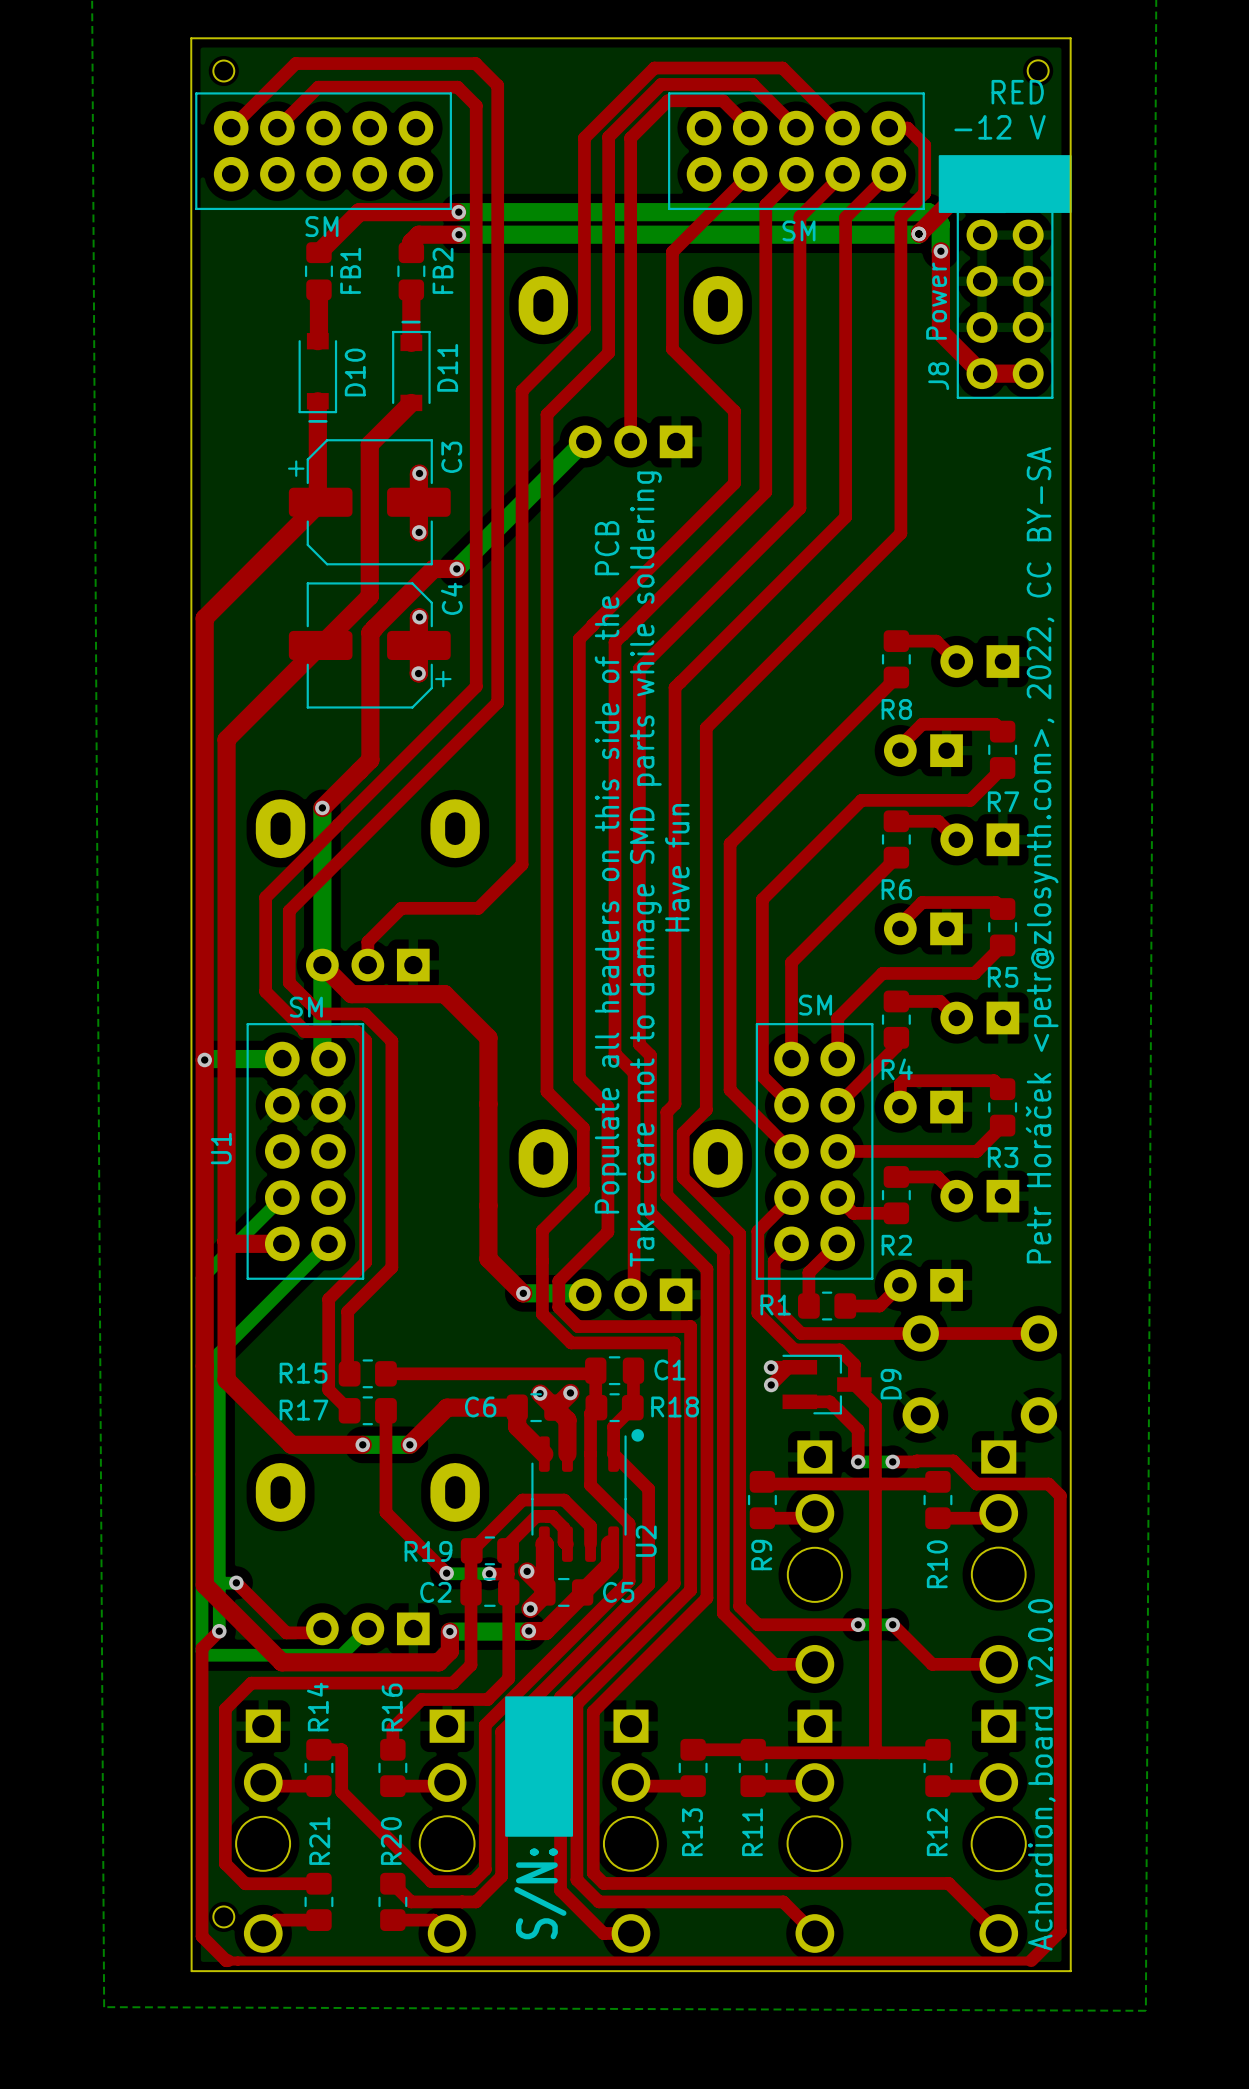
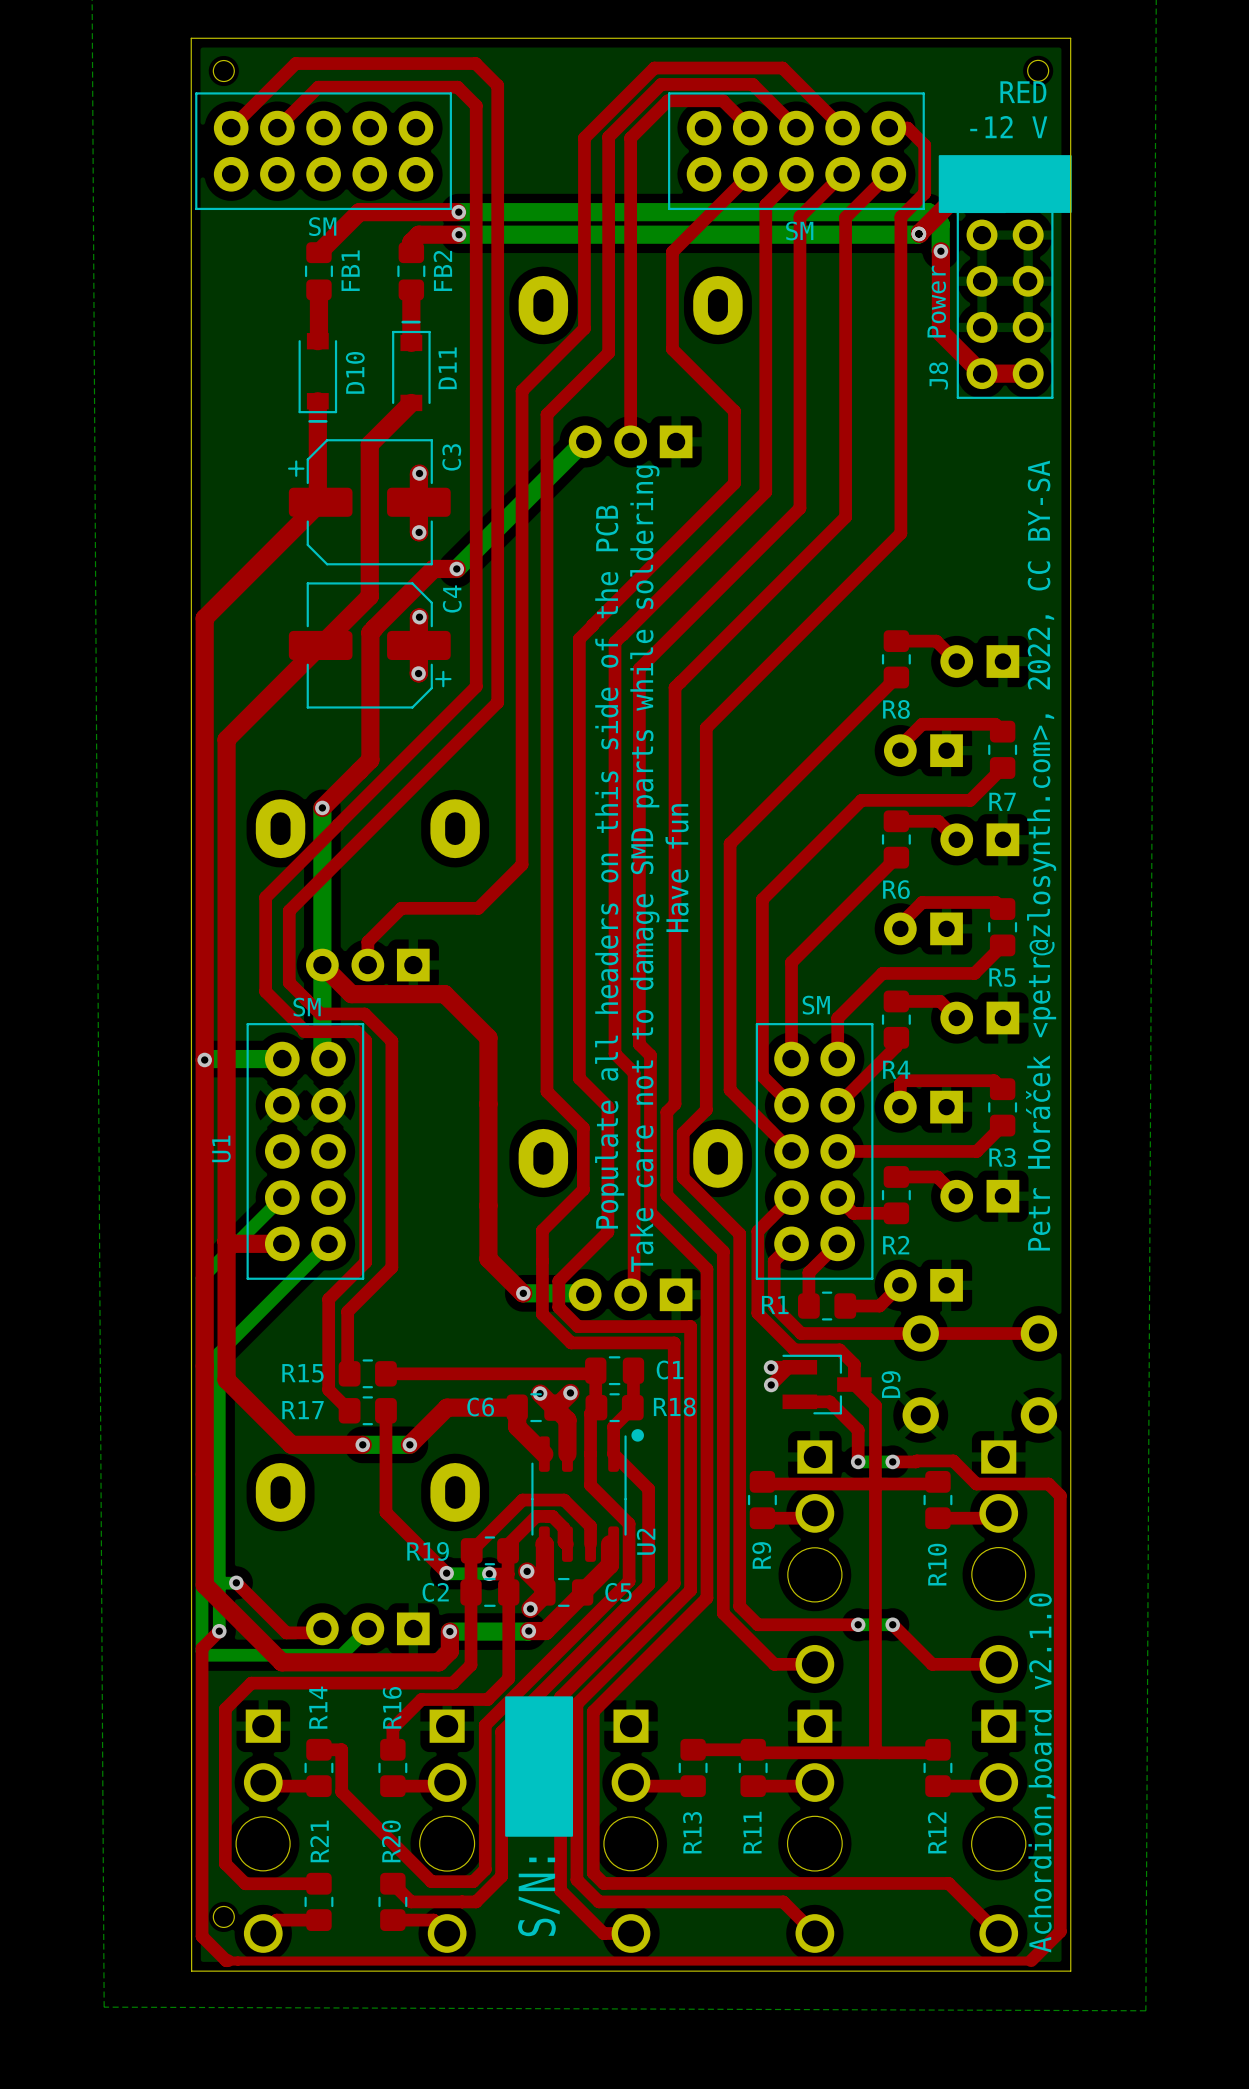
text: board v2.0.0 (1040, 1691) -> board v2.1.0 (1040, 1690)

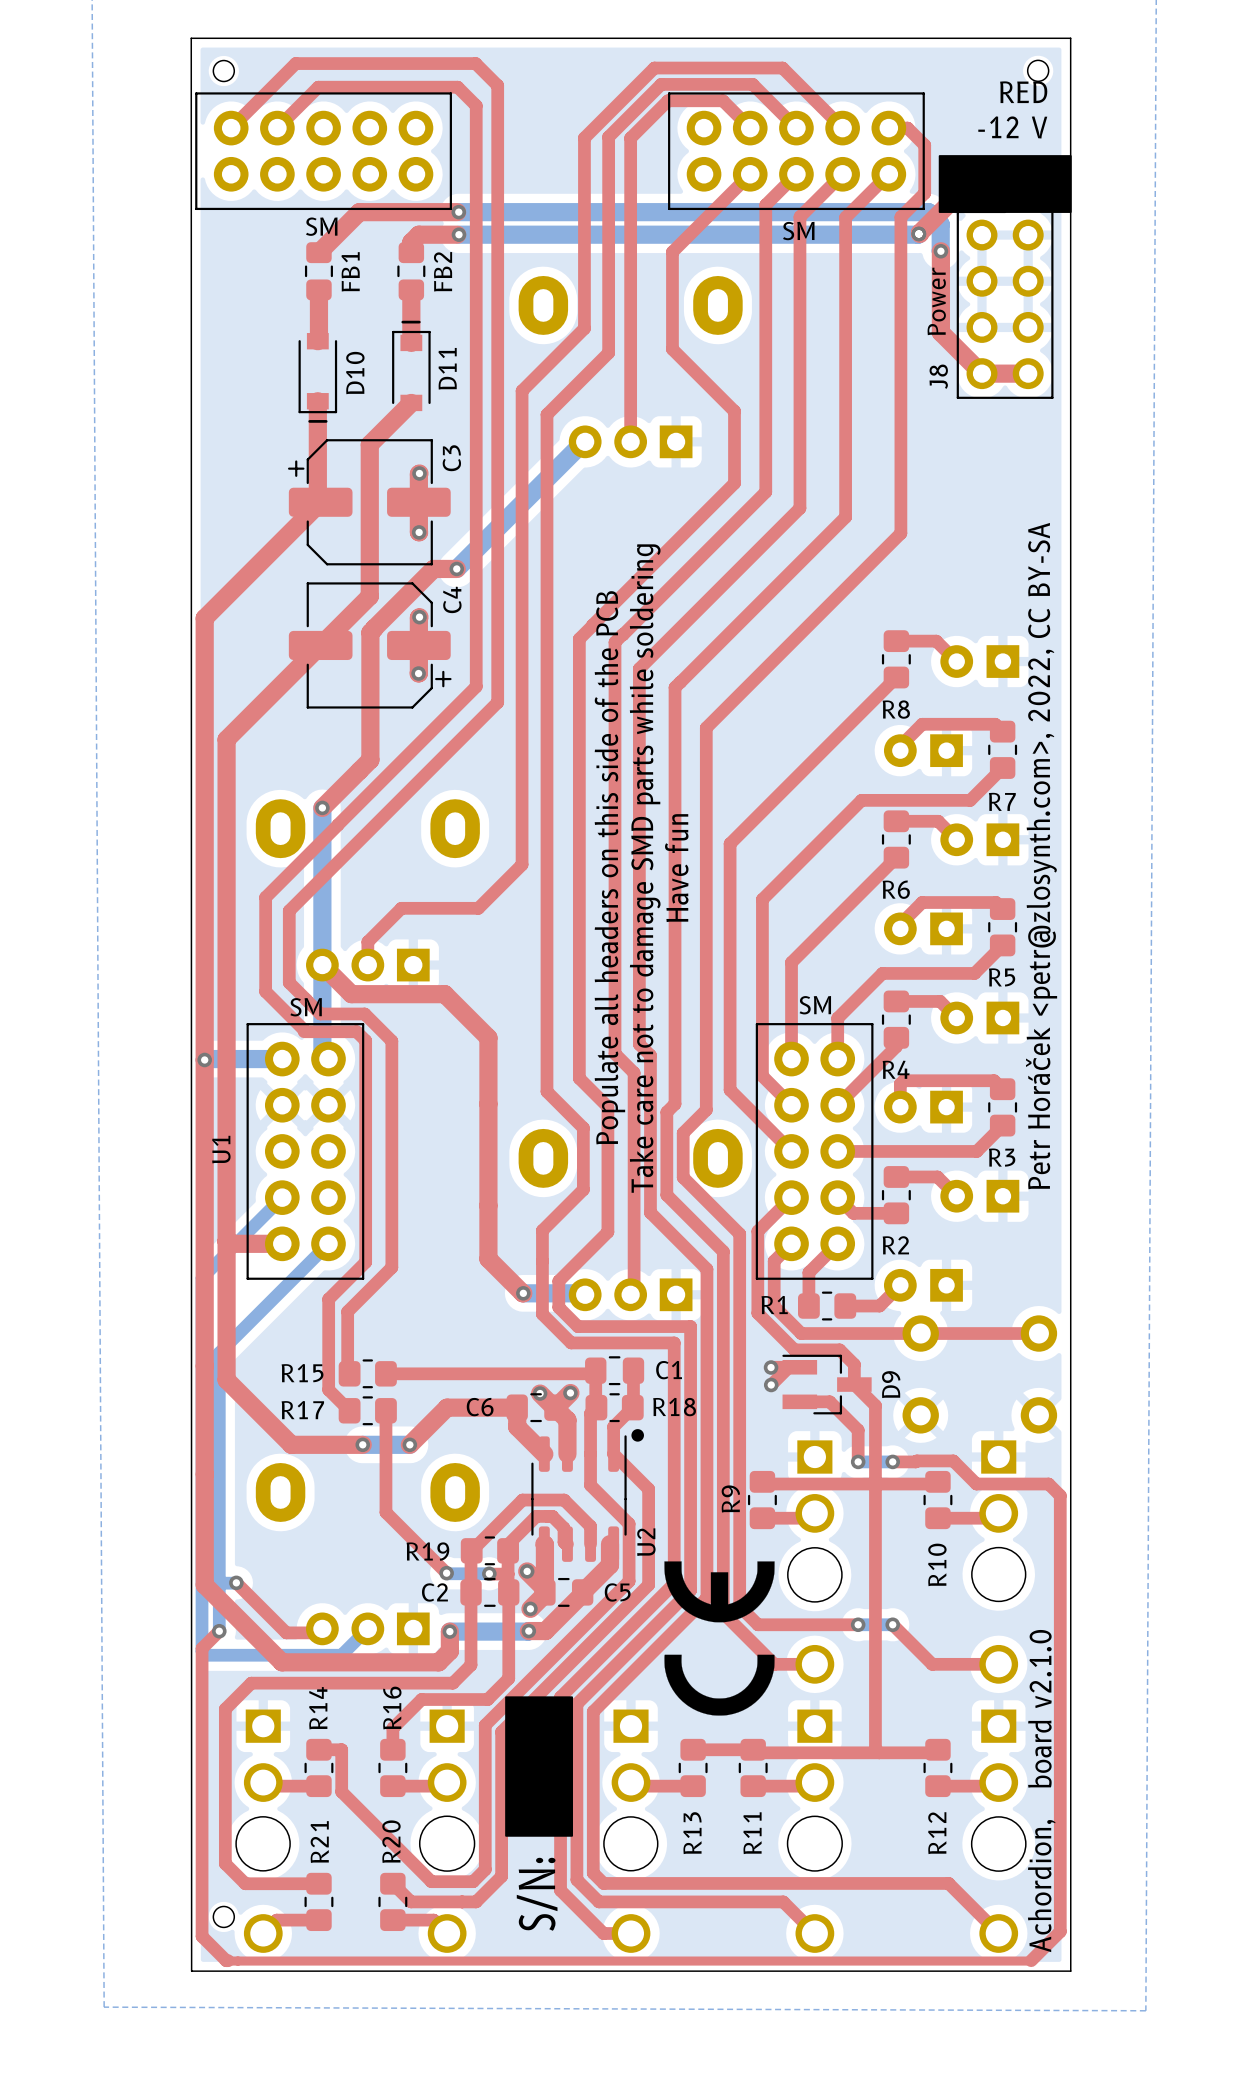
R9 name position: R9 (761, 1555) -> R9 (730, 1498)
drawing: none -> [664, 1561, 775, 1716]

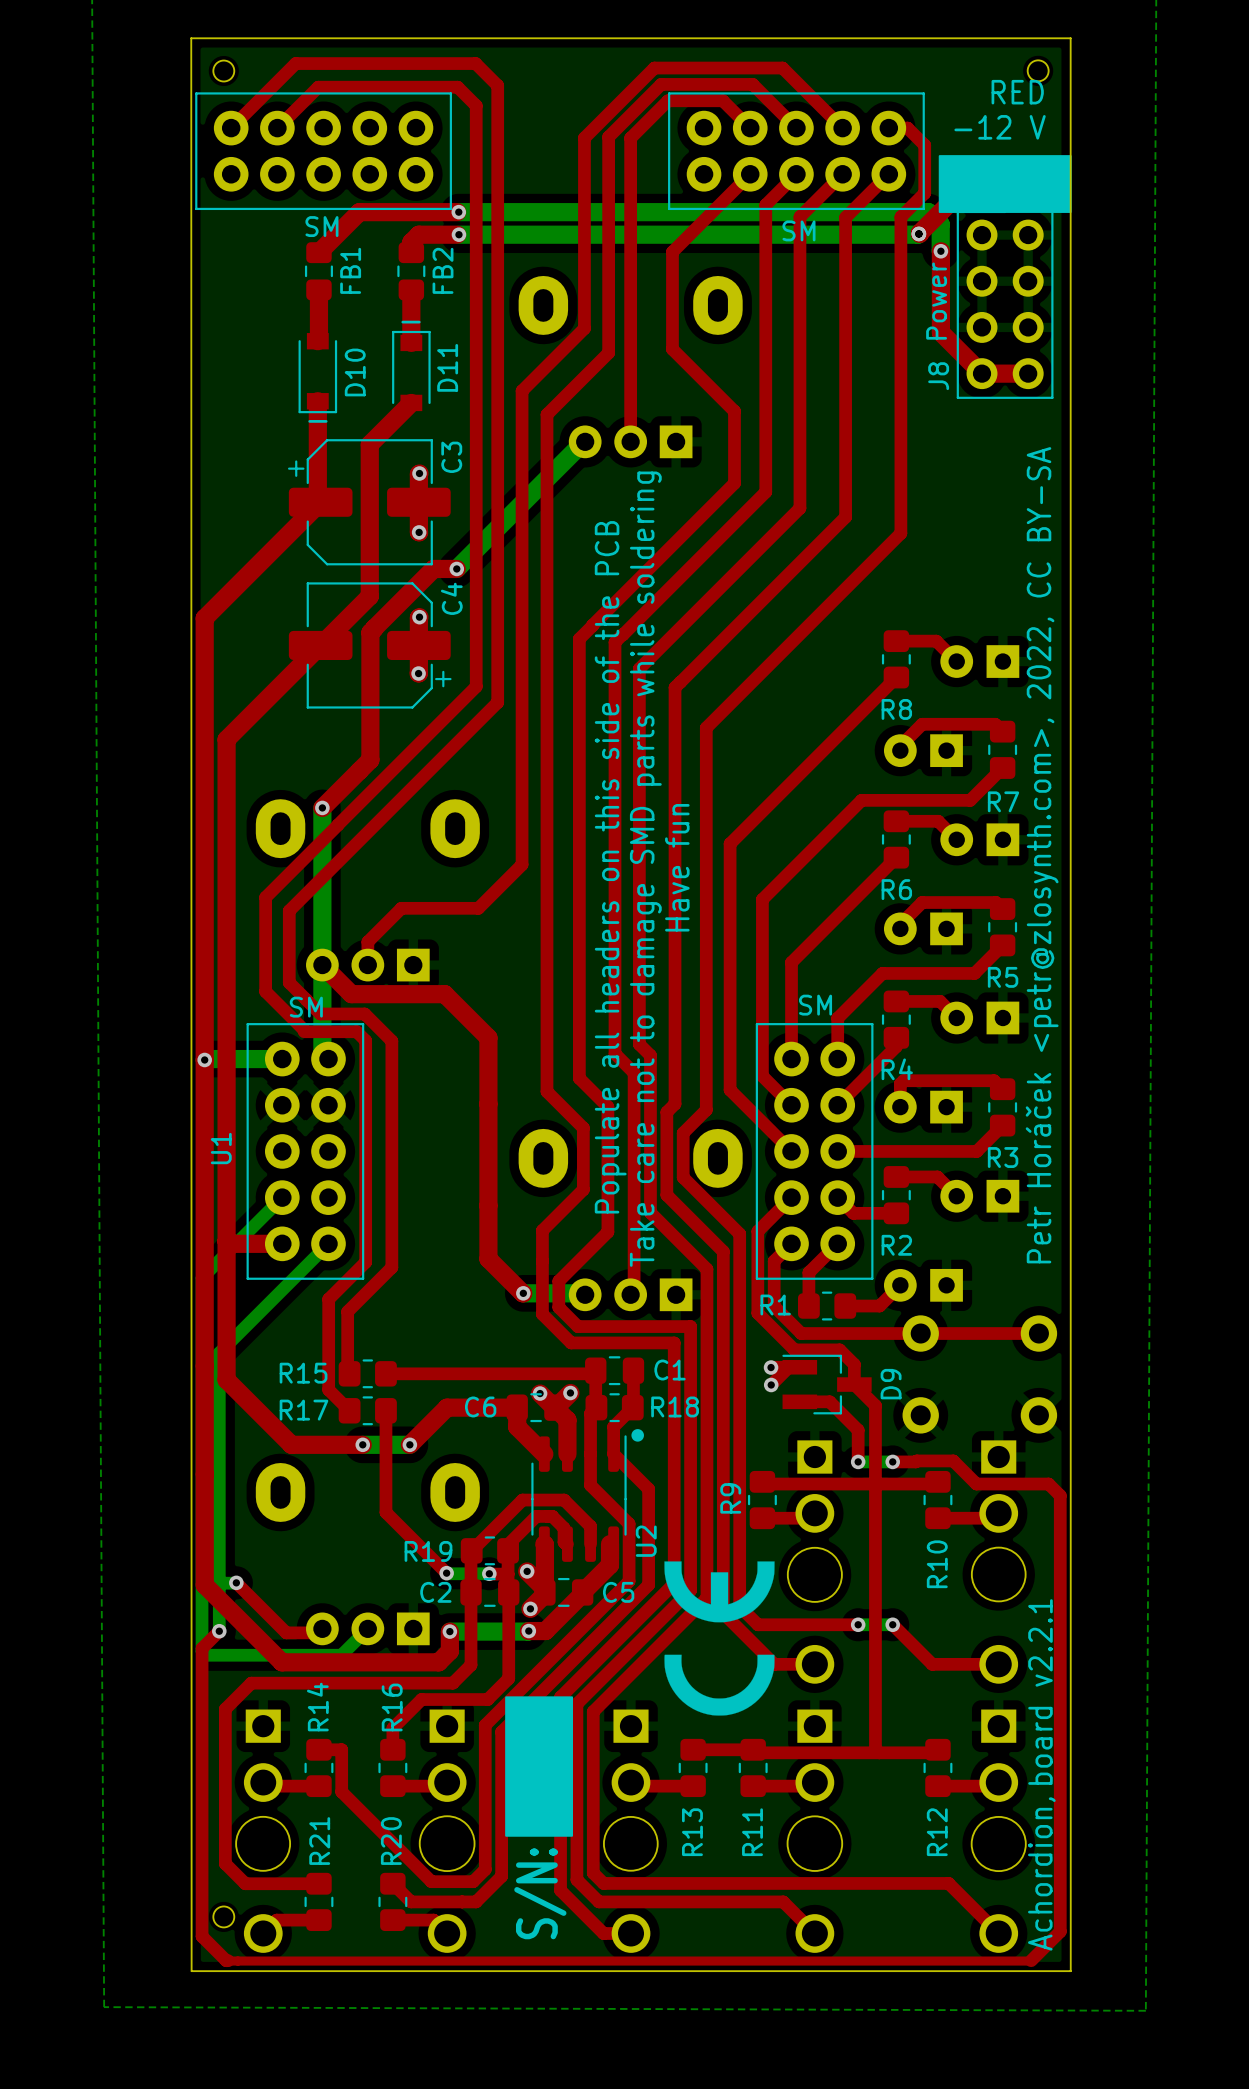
text: board v2.1.0 (1039, 1708) -> board v2.2.1 (1040, 1691)

